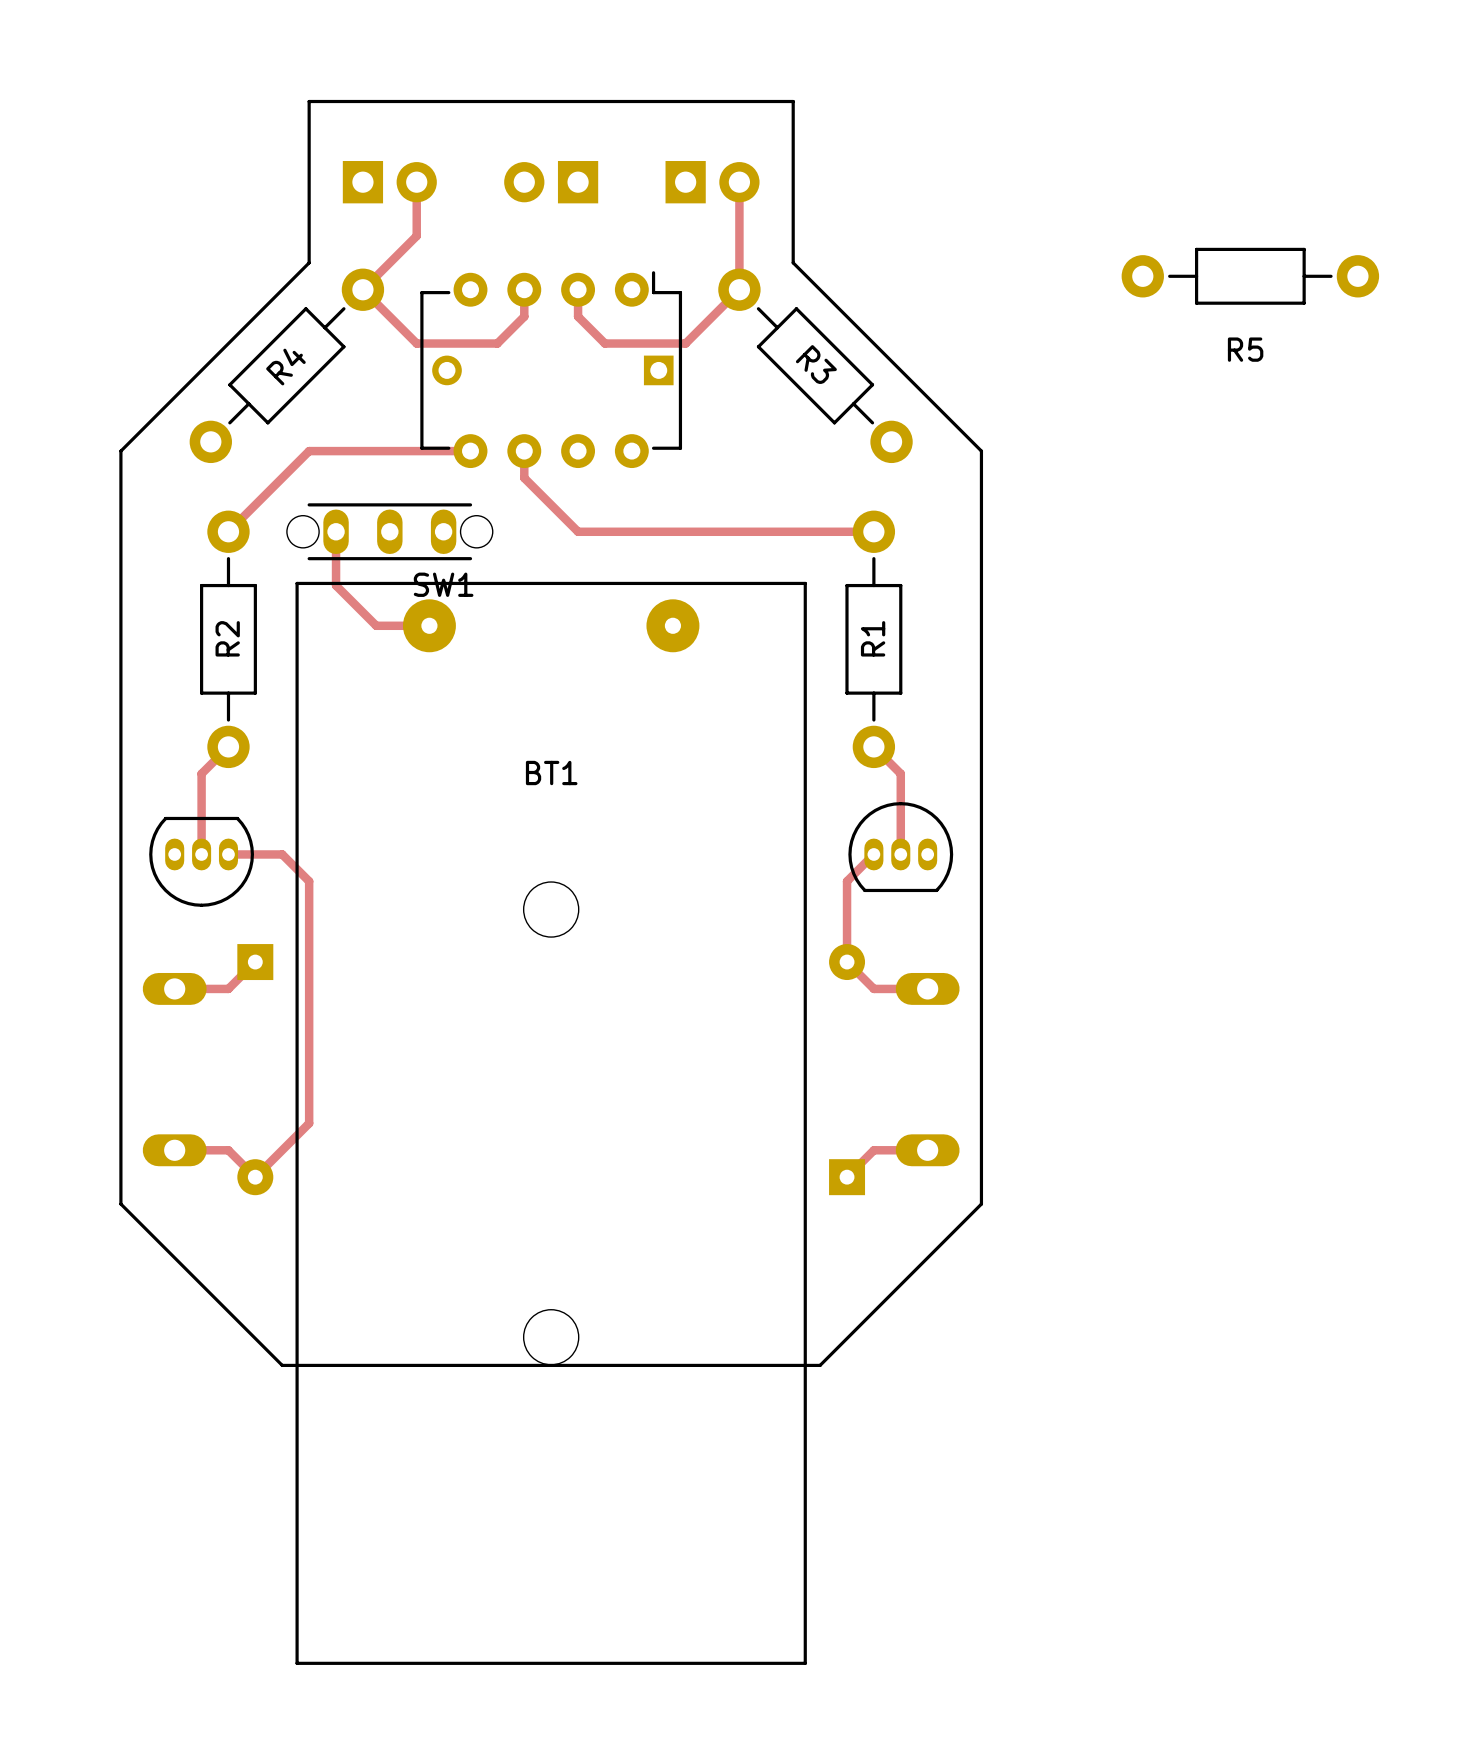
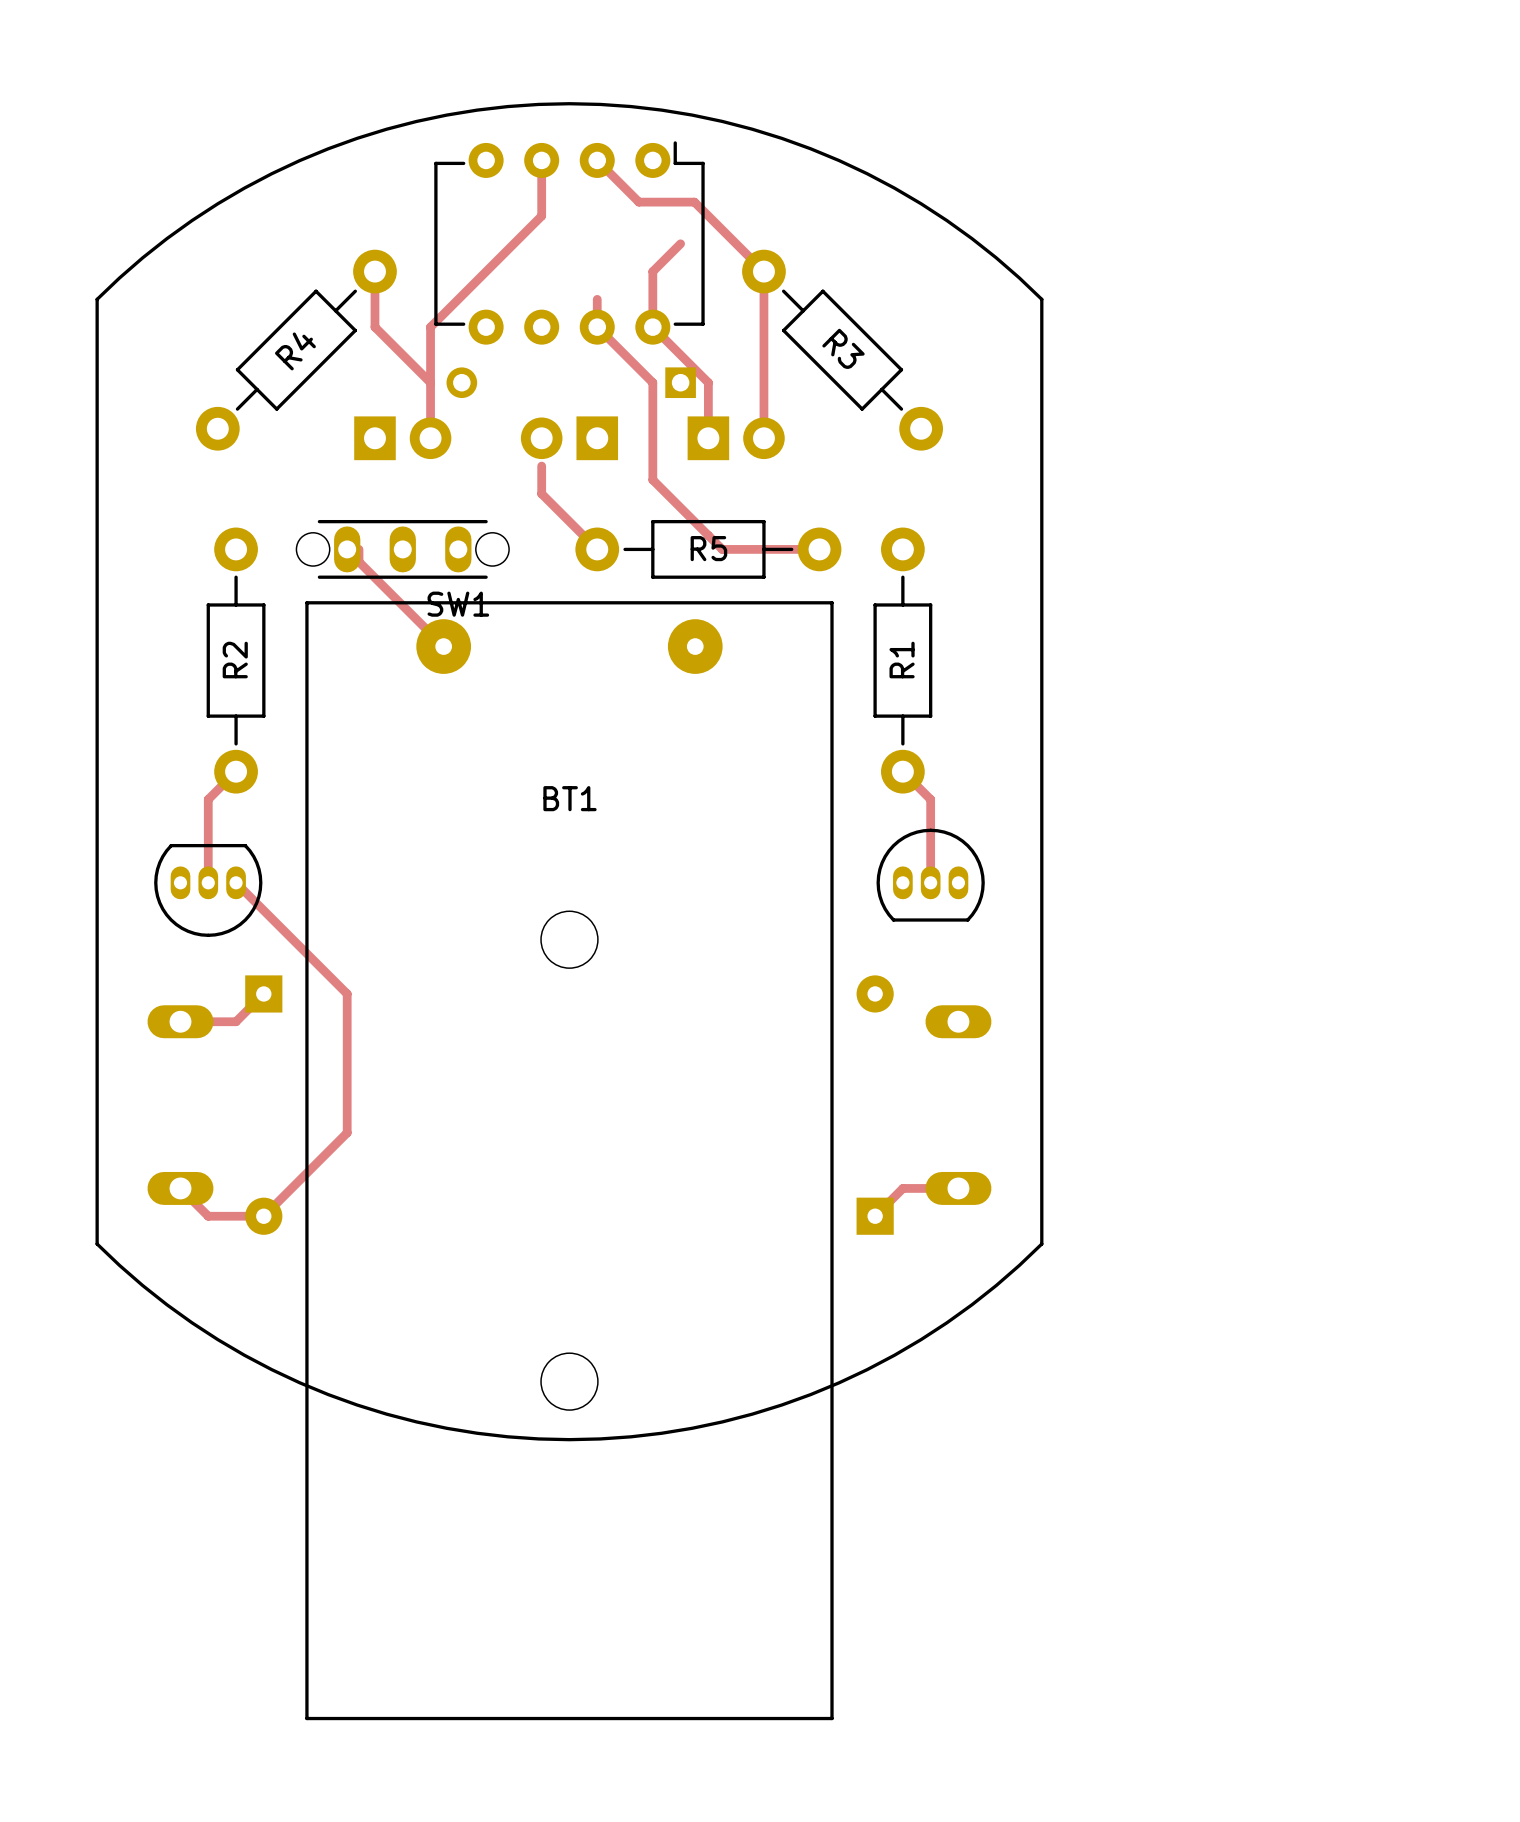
board edge: (309, 101) (309, 262) (120, 451) (120, 1204) (282, 1365) (820, 1365) (981, 1204) (981, 451) (793, 262) (793, 101) (309, 101) -> (97, 299) (97, 1244) (142, 1285) (191, 1322) (244, 1355) (299, 1382) (357, 1405) (446, 1428) (507, 1436) (569, 1439) (631, 1436) (692, 1428) (781, 1405) (839, 1382) (894, 1355) (946, 1322) (996, 1285) (1041, 1244) (1041, 299) (996, 257) (946, 220) (894, 188) (839, 160) (781, 138) (722, 121) (661, 110) (569, 103) (507, 106) (416, 121) (357, 138) (299, 160) (244, 188) (191, 220) (142, 257) (97, 299)
track: none -> (541, 160) (541, 216) (430, 327) (430, 438)
part: (389, 182) -> none
track: (416, 182) (416, 235) (362, 289) (416, 343) (497, 343) (524, 316) (524, 289) -> none
part: (551, 182) -> none
part: (712, 182) -> none
track: (739, 182) (739, 262) -> (597, 160) (638, 202) (694, 202) (763, 271)
track: none -> (680, 243) (652, 271) (652, 327) (708, 382) (708, 438)
track: none -> (374, 271) (374, 327) (430, 382)
R5 position: (1250, 276) -> (708, 549)
track: (739, 289) (685, 343) (604, 343) -> (763, 299) (763, 438)
R5 name position: R5 (1245, 349) -> R5 (708, 548)
R4 position: (286, 365) -> (296, 350)
R3 position: (815, 365) -> (842, 350)
part position: (551, 369) -> (569, 242)
part: none -> (402, 438)
part: none -> (569, 438)
part: none -> (736, 438)
track: (470, 451) (309, 451) (228, 531) -> none
track: (336, 531) (336, 585) (376, 625) (429, 625) -> (359, 549) (359, 561) (443, 646)
track: (578, 531) (699, 531) -> (625, 354) (652, 382) (652, 479) (722, 549)
track: (793, 531) (873, 531) -> none
track: (228, 854) (282, 854) (309, 881) (309, 1123) -> (236, 882) (347, 993) (347, 1132) (319, 1160)
track: (873, 854) (847, 881) (847, 962) (873, 988) (927, 988) -> none
track: (174, 1150) (228, 1150) (255, 1177) -> (180, 1188) (208, 1216) (263, 1216)

